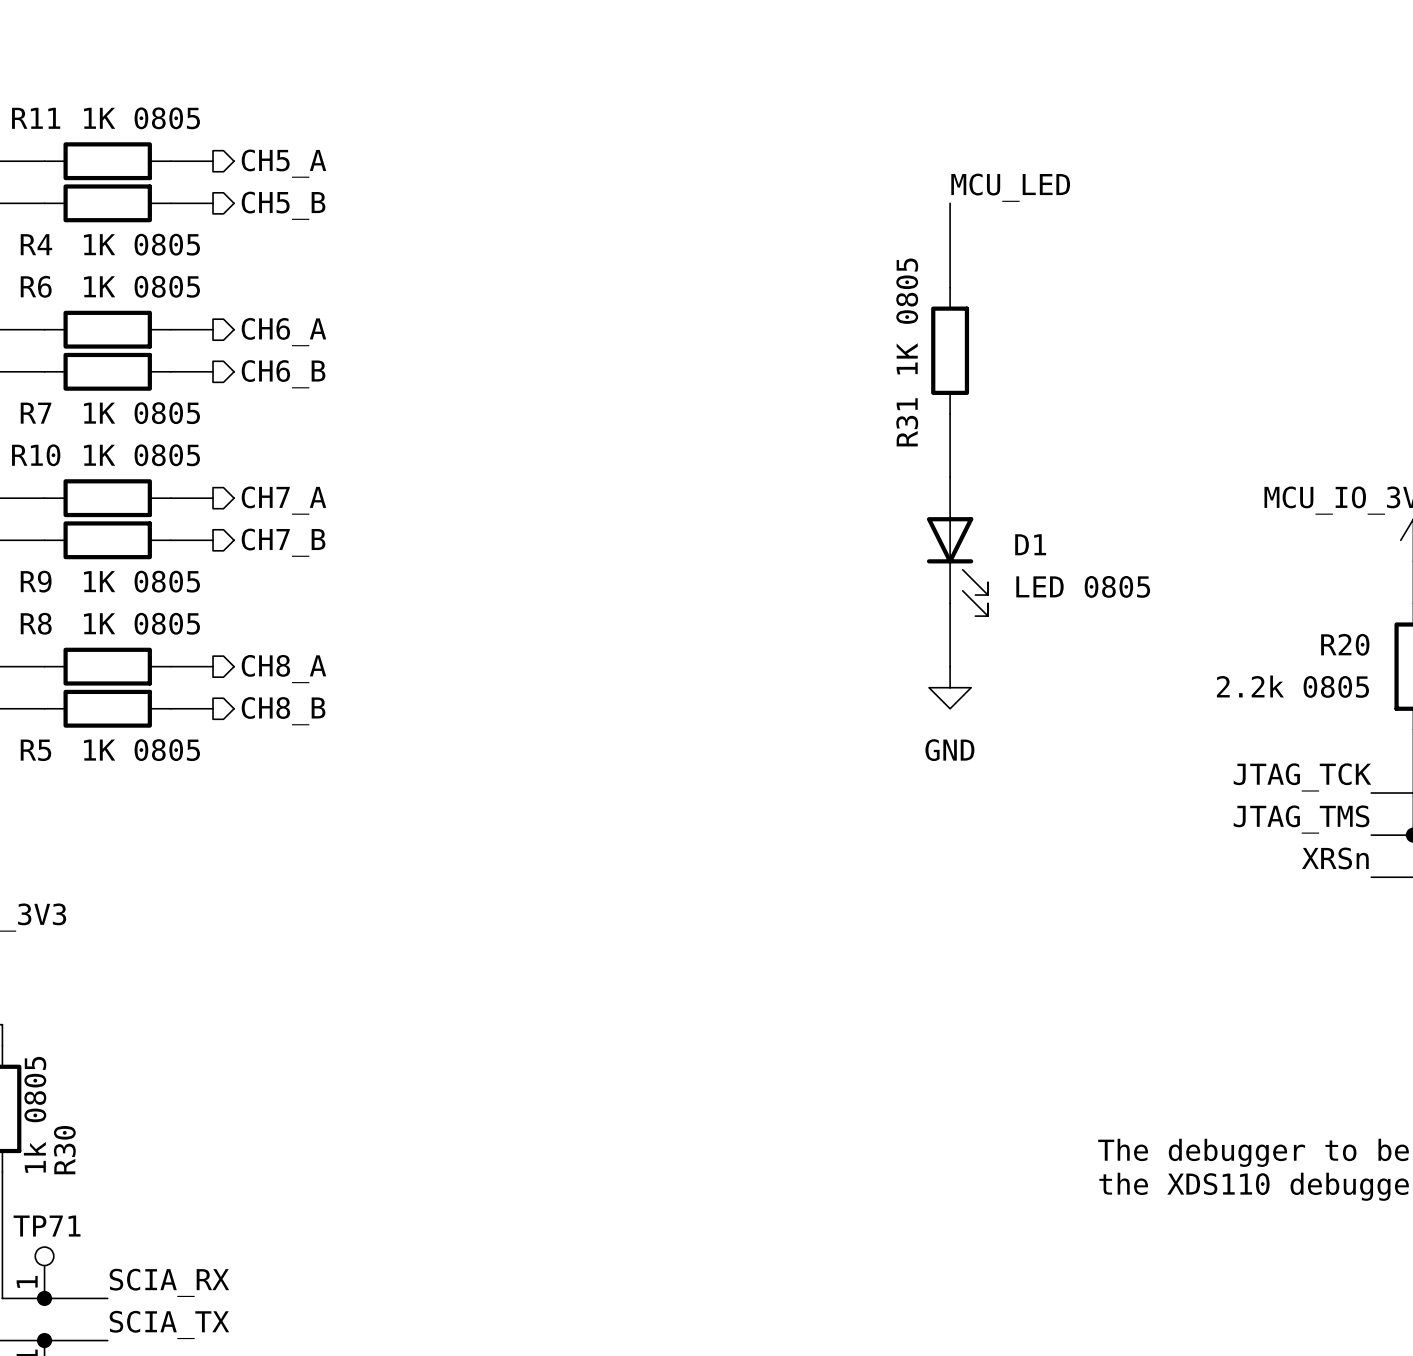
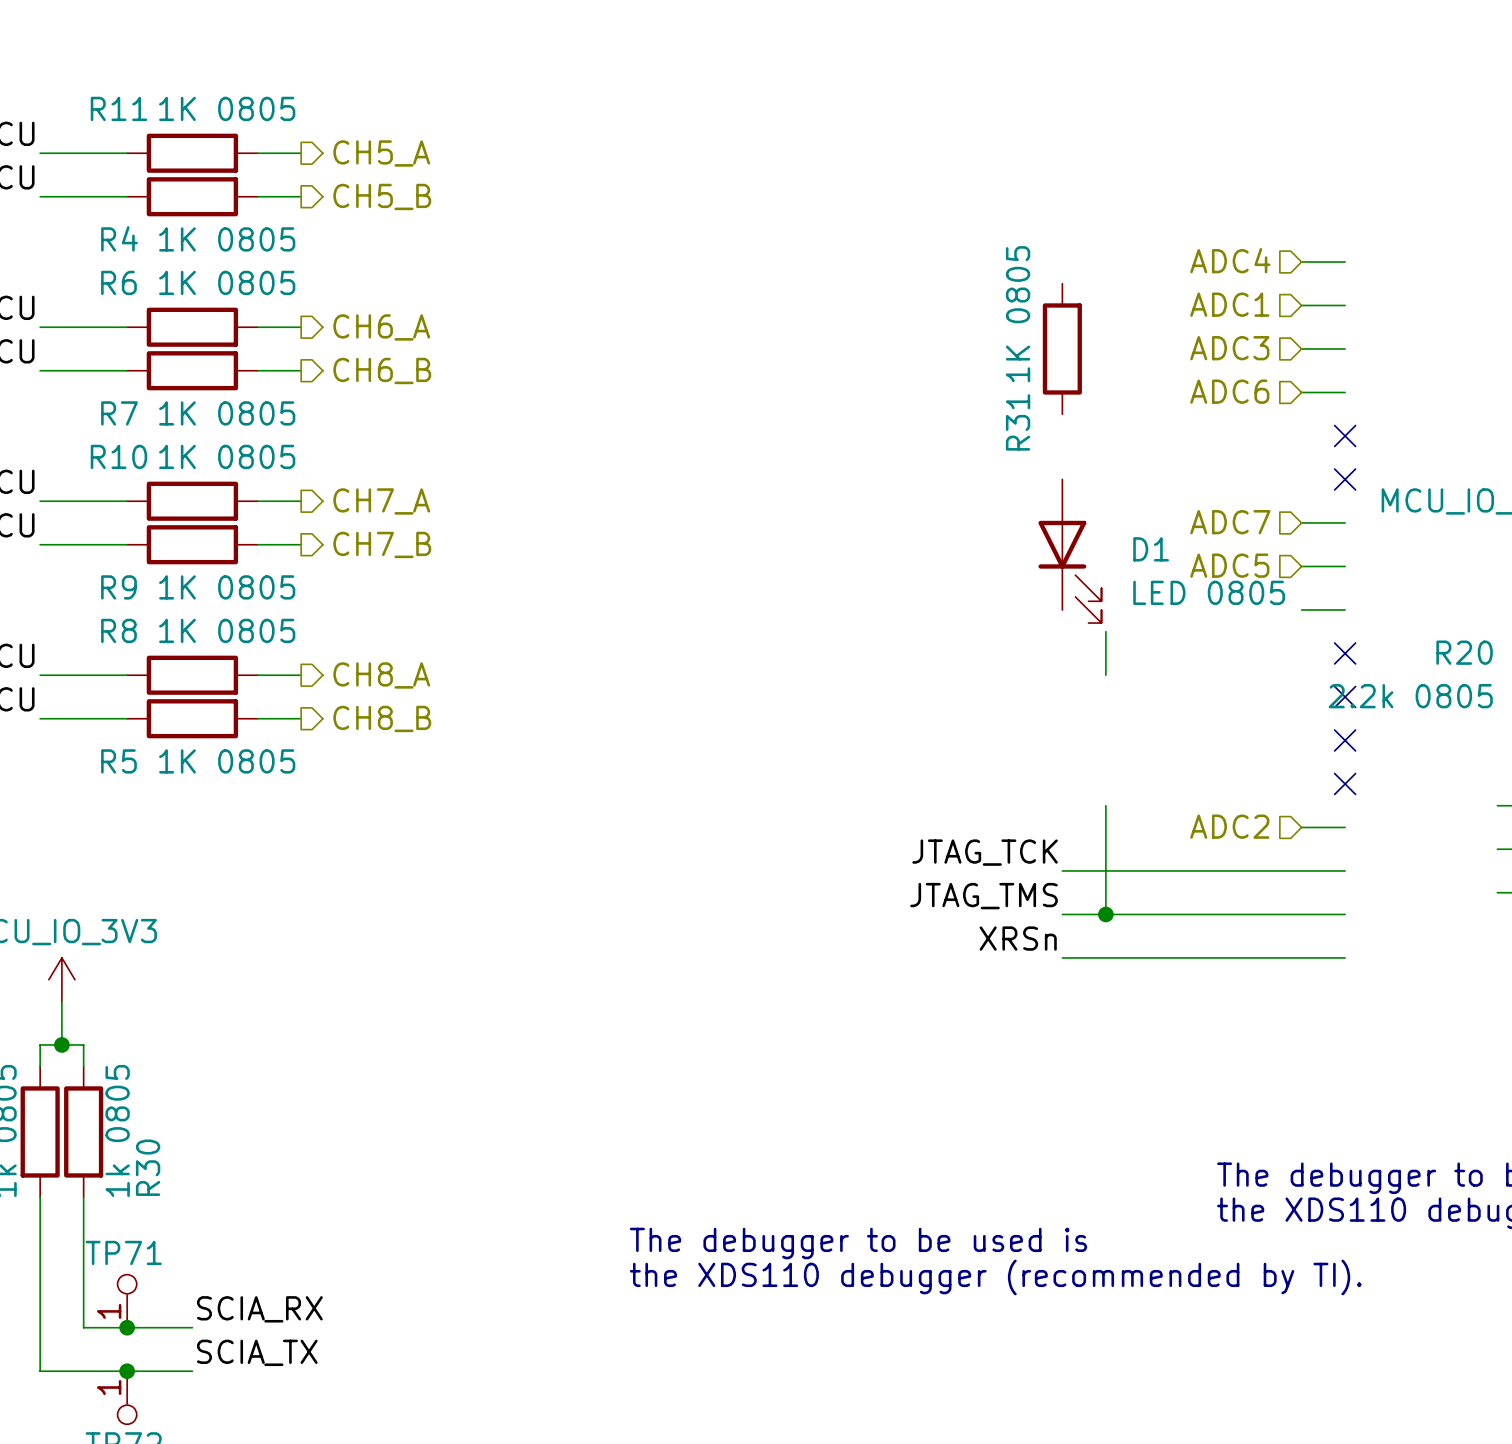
label: MCU_LED (1010, 187) -> none
wire: (950, 203) (950, 287) -> none
hierarchical label: none -> ADC4 (1230, 260)
wire: none -> (1301, 261) (1345, 261)
hierarchical label: none -> ADC1 (1229, 304)
wire: none -> (1301, 305) (1345, 305)
hierarchical label: none -> ADC3 (1229, 348)
wire: none -> (1301, 348) (1345, 348)
hierarchical label: none -> ADC6 (1229, 391)
wire: none -> (1301, 392) (1345, 392)
wire: (950, 413) (950, 477) -> none
no-connect mark: none -> (1345, 435)
no-connect mark: none -> (1345, 479)
hierarchical label: none -> ADC7 (1230, 522)
wire: none -> (1301, 522) (1345, 522)
hierarchical label: none -> ADC5 (1229, 565)
wire: none -> (1301, 566) (1345, 566)
wire: (950, 603) (950, 666) -> none
wire: none -> (1301, 609) (1345, 609)
wire: none -> (1105, 631) (1105, 675)
no-connect mark: none -> (1345, 653)
power symbol: GND (950, 687) -> none
no-connect mark: none -> (1345, 696)
no-connect mark: none -> (1345, 740)
no-connect mark: none -> (1345, 783)
label: JTAG_TCK (1302, 777) -> none
wire: none -> (1105, 805) (1105, 914)
hierarchical label: none -> ADC2 (1229, 826)
wire: none -> (1301, 827) (1345, 827)
label: JTAG_TMS (1301, 819) -> none
label: none -> JTAG_TCK (985, 852)
wire: none -> (1062, 870) (1345, 870)
label: XRSn (1335, 858) -> none
label: none -> JTAG_TMS (984, 896)
wire: none -> (1062, 914) (1345, 914)
junction: none -> (1105, 914)
label: none -> XRSn (1018, 938)
wire: none -> (1062, 957) (1345, 957)
text: none -> The debugger to be used is (858, 1243)
text: none -> the XDS110 debugger (recommended by TI). (995, 1277)

